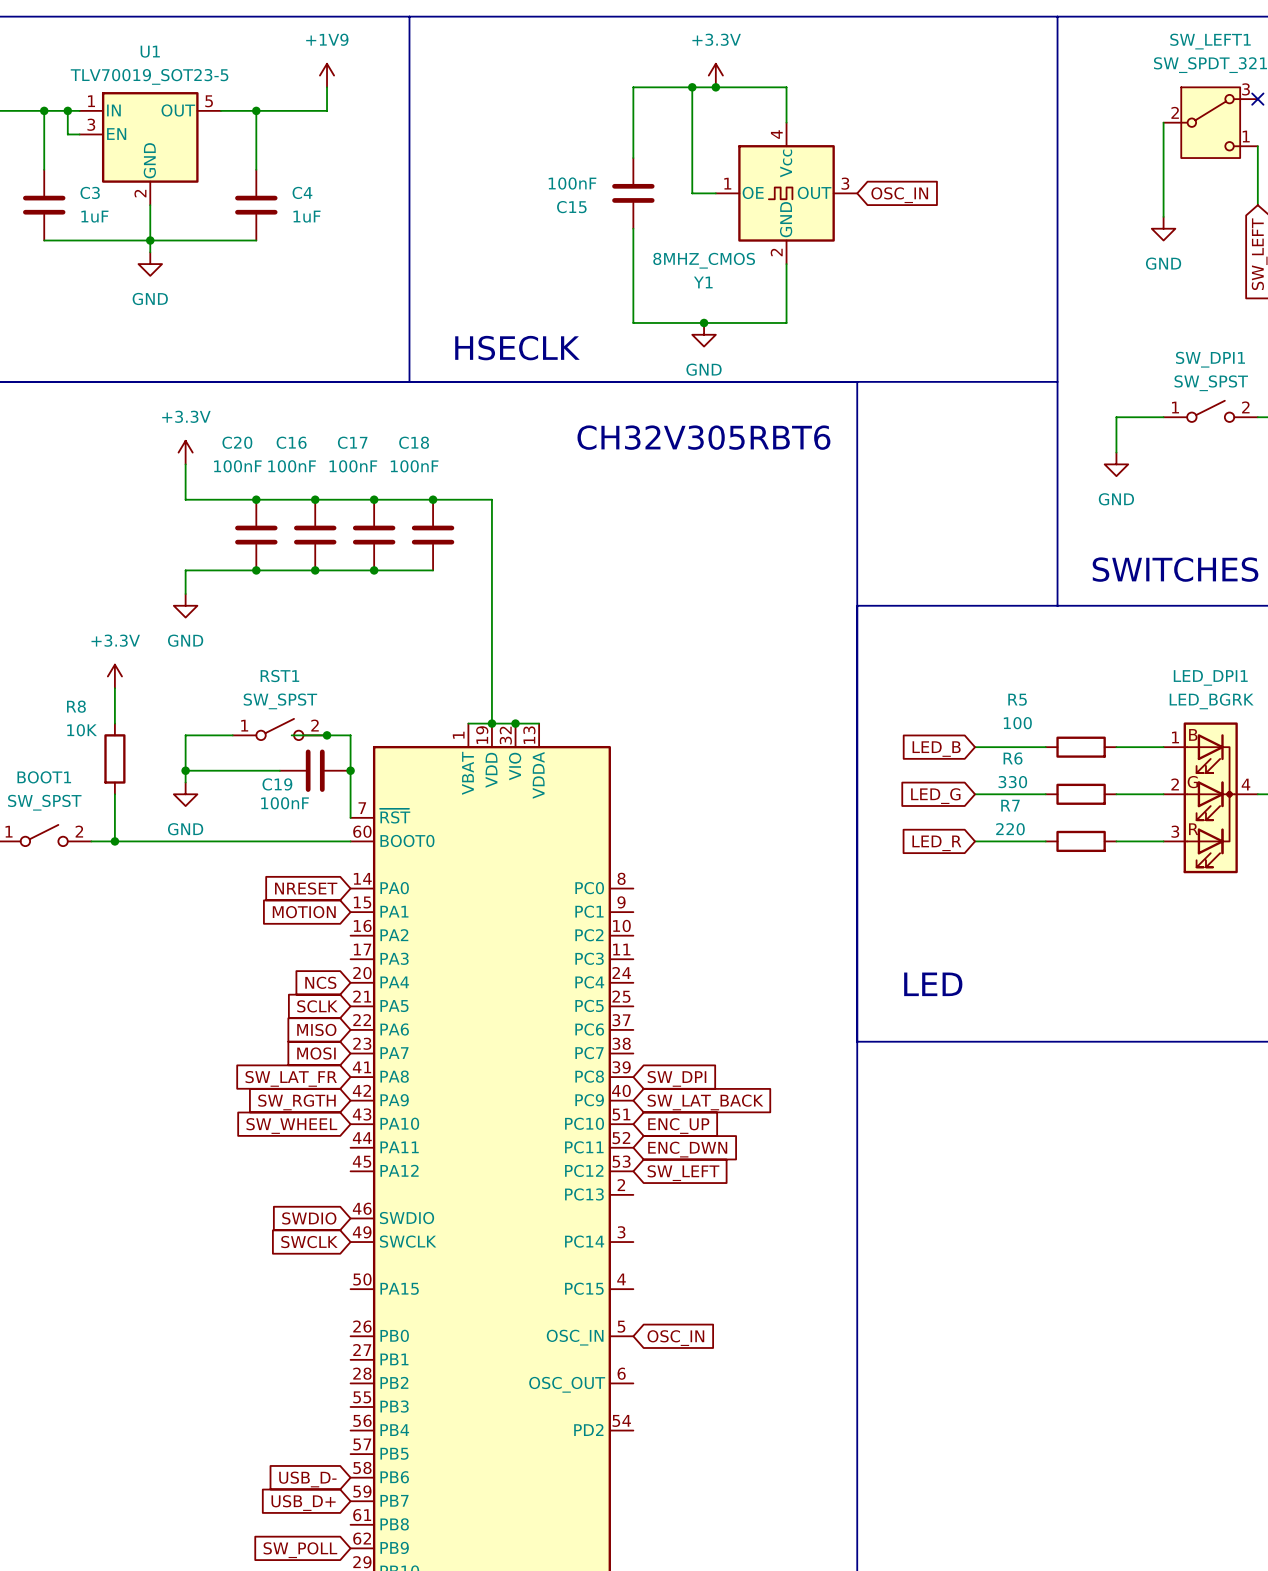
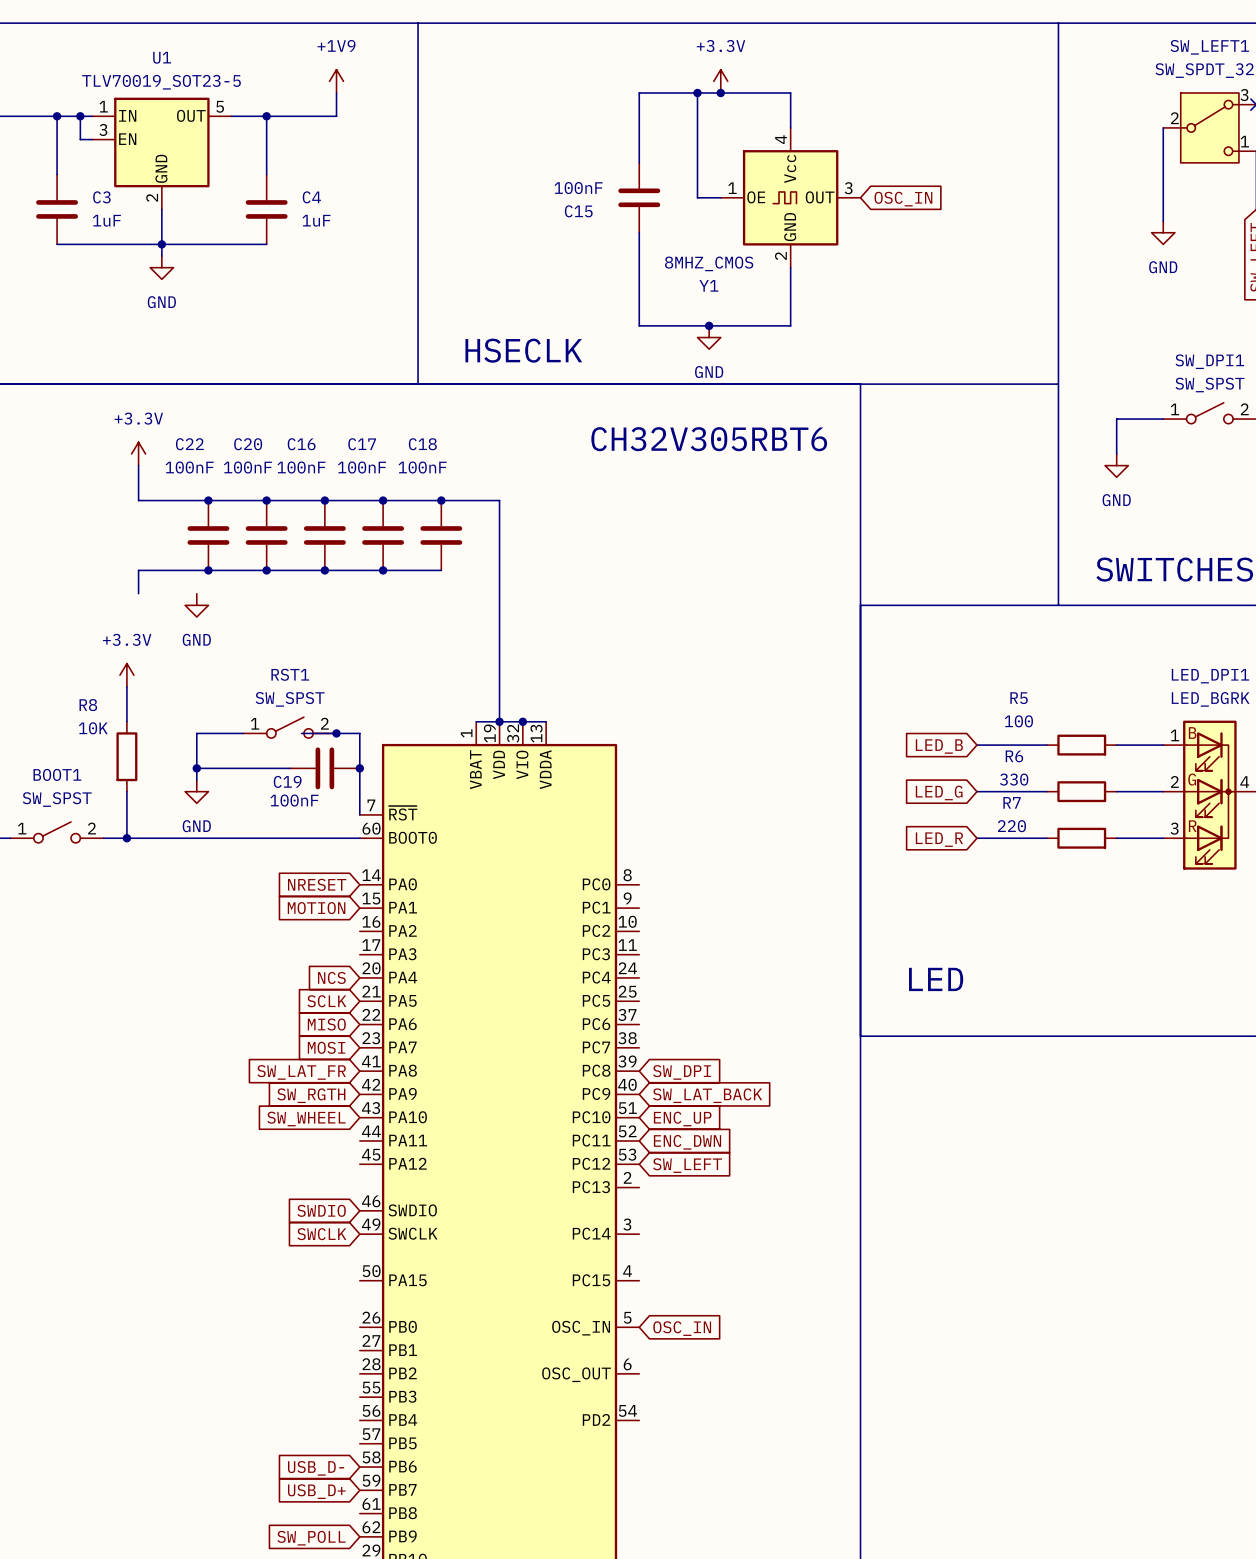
power symbol position: +3.3V (185, 452) -> +3.3V (138, 453)
wire: (185, 464) (185, 499) -> (138, 465) (138, 500) (196, 500)
junction: none -> (208, 500)
C22: none -> 100nF (208, 535)
wire: (185, 570) (185, 593) -> (196, 570) (138, 570) (138, 593)
junction: none -> (208, 570)

